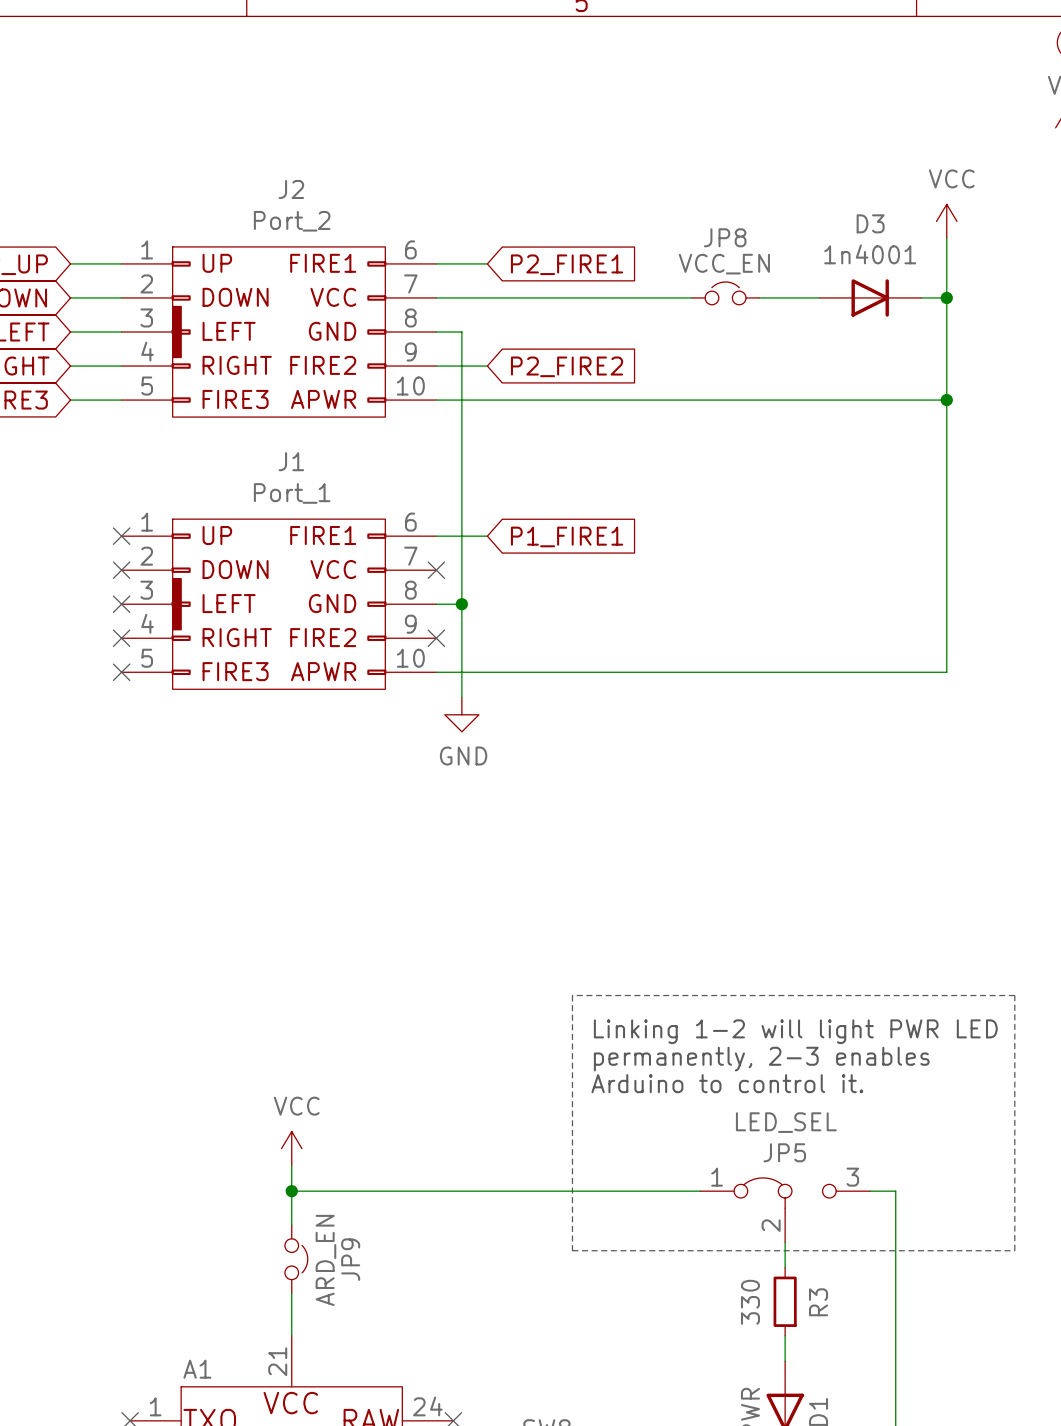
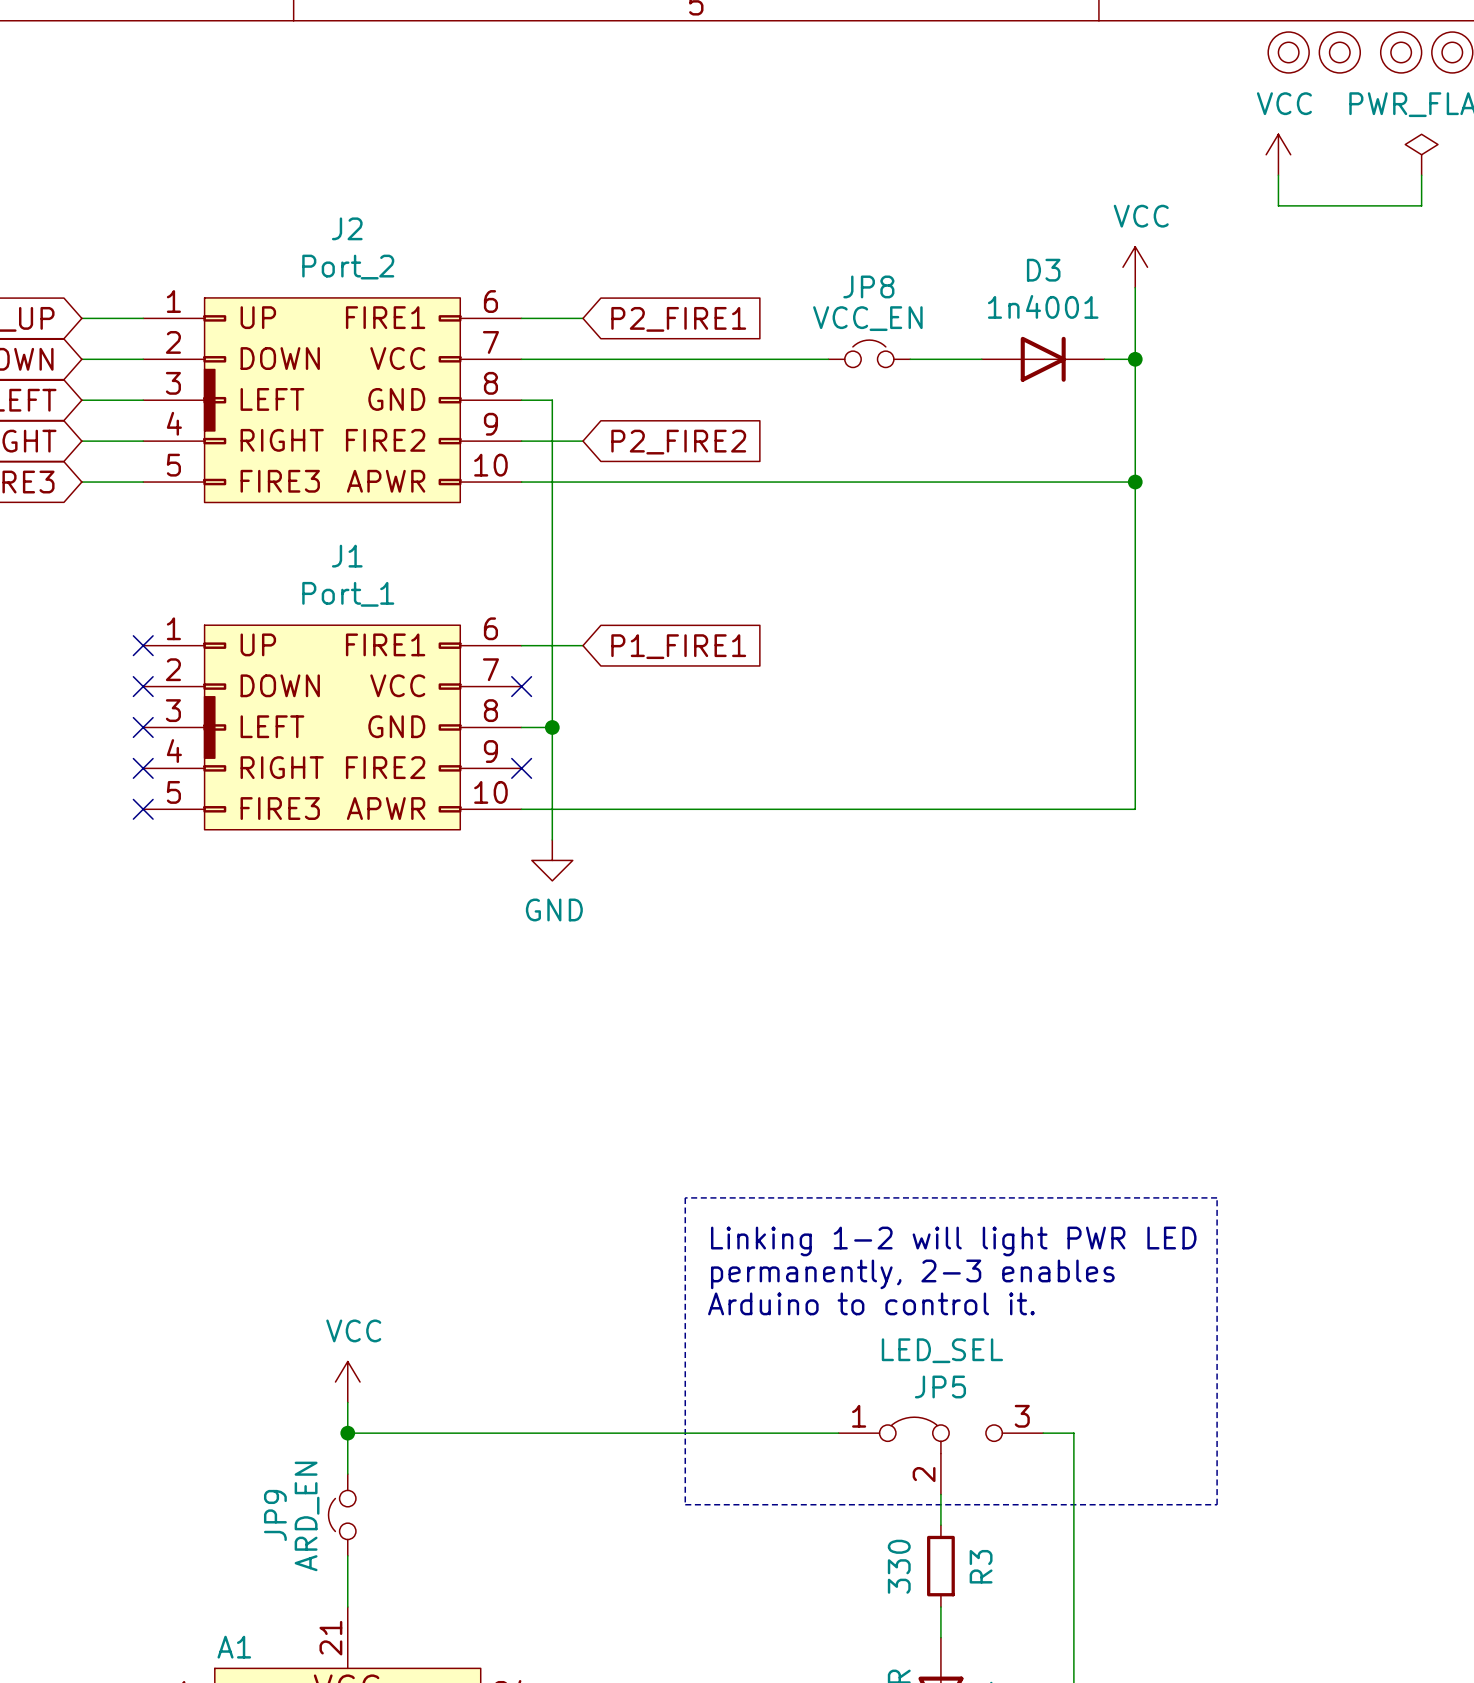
JP9 rotation: 0° (296, 1259) -> 180° (342, 1514)

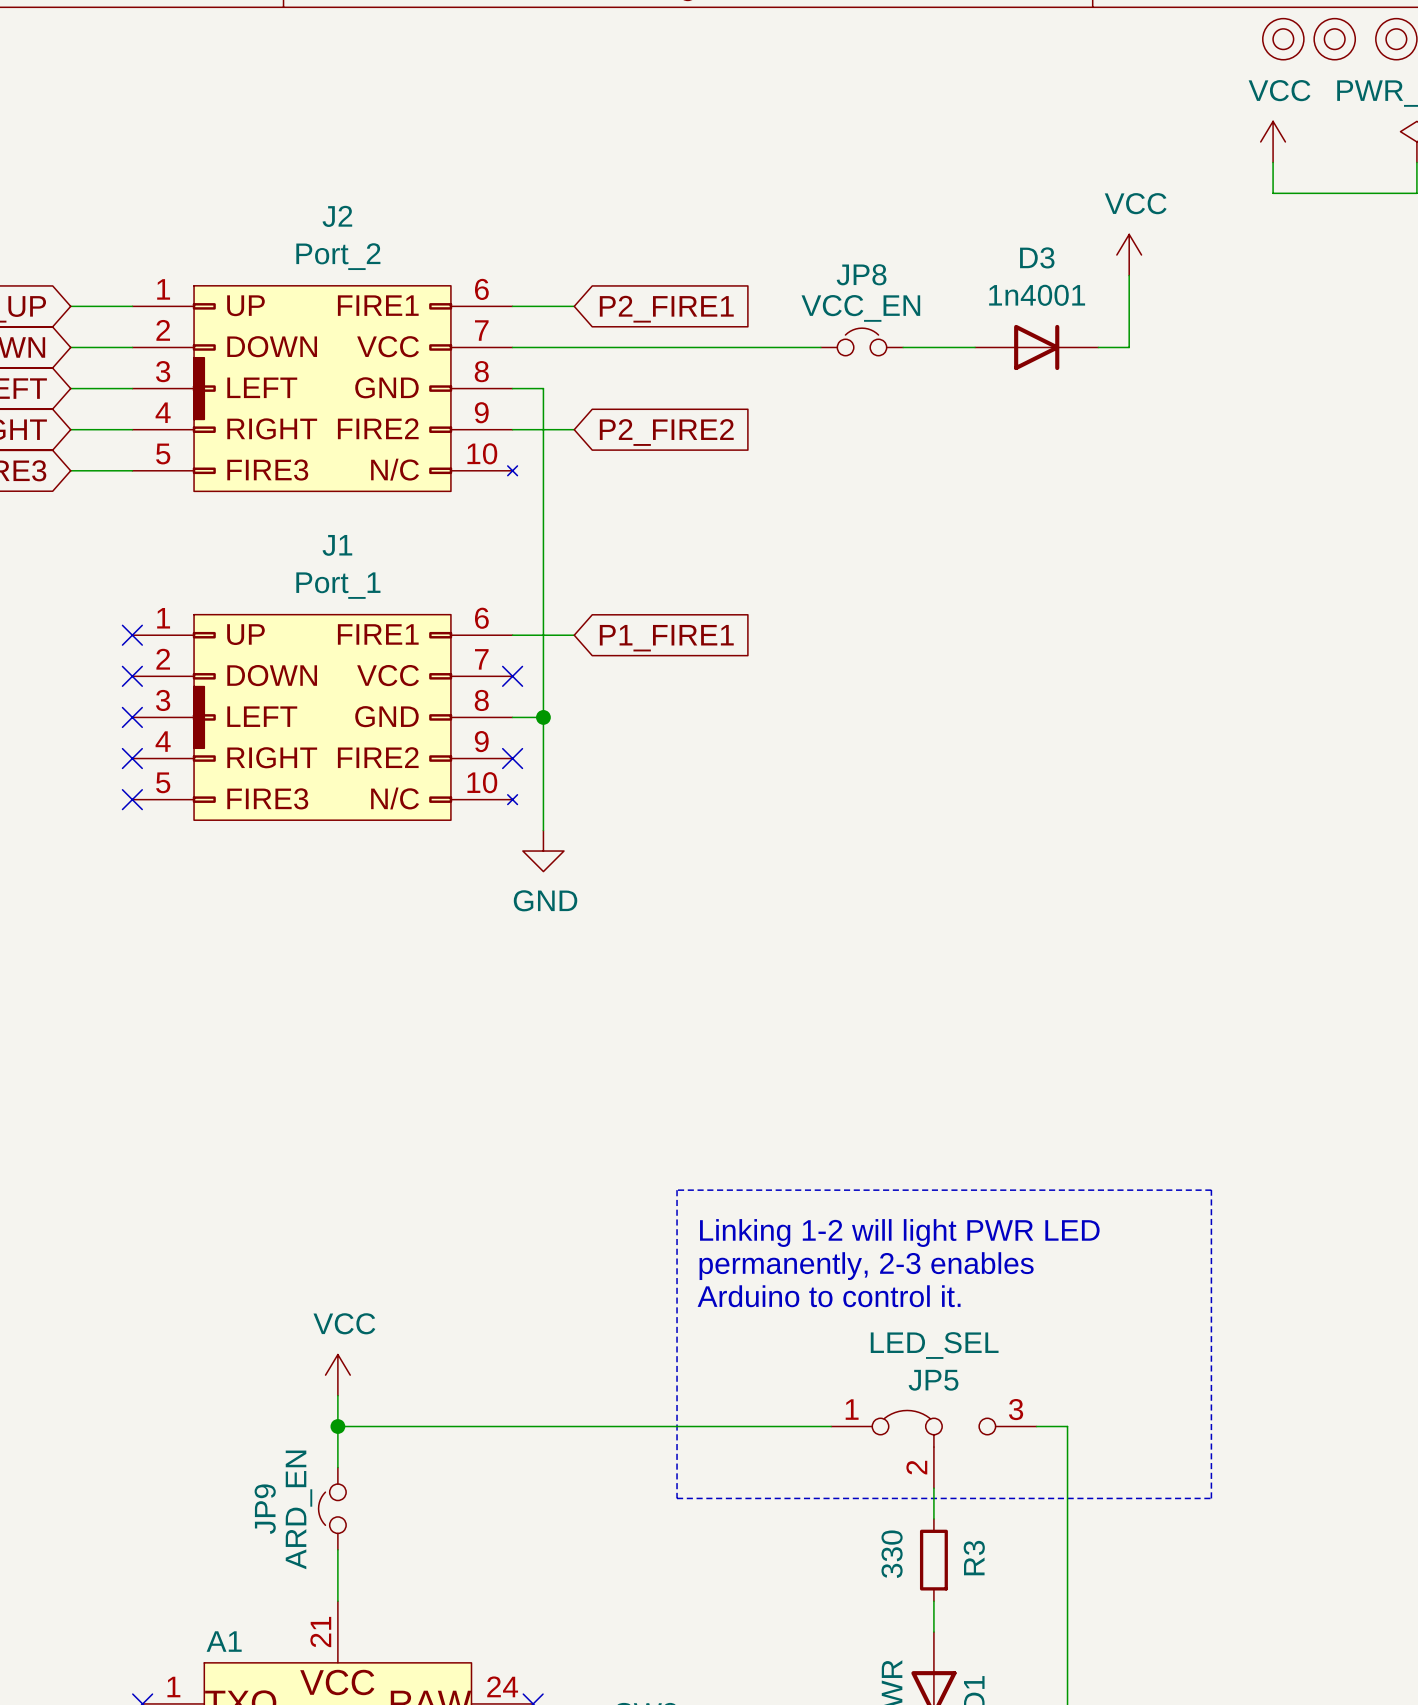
J2 symbol: [143, 297, 522, 503] -> [132, 285, 518, 492]
wire: (1135, 359) (1135, 809) (521, 809) -> none
junction: (1135, 359) -> none
wire: (521, 482) (1135, 482) -> none
junction: (1135, 482) -> none
J1 symbol: [143, 625, 522, 830] -> [132, 614, 518, 821]

